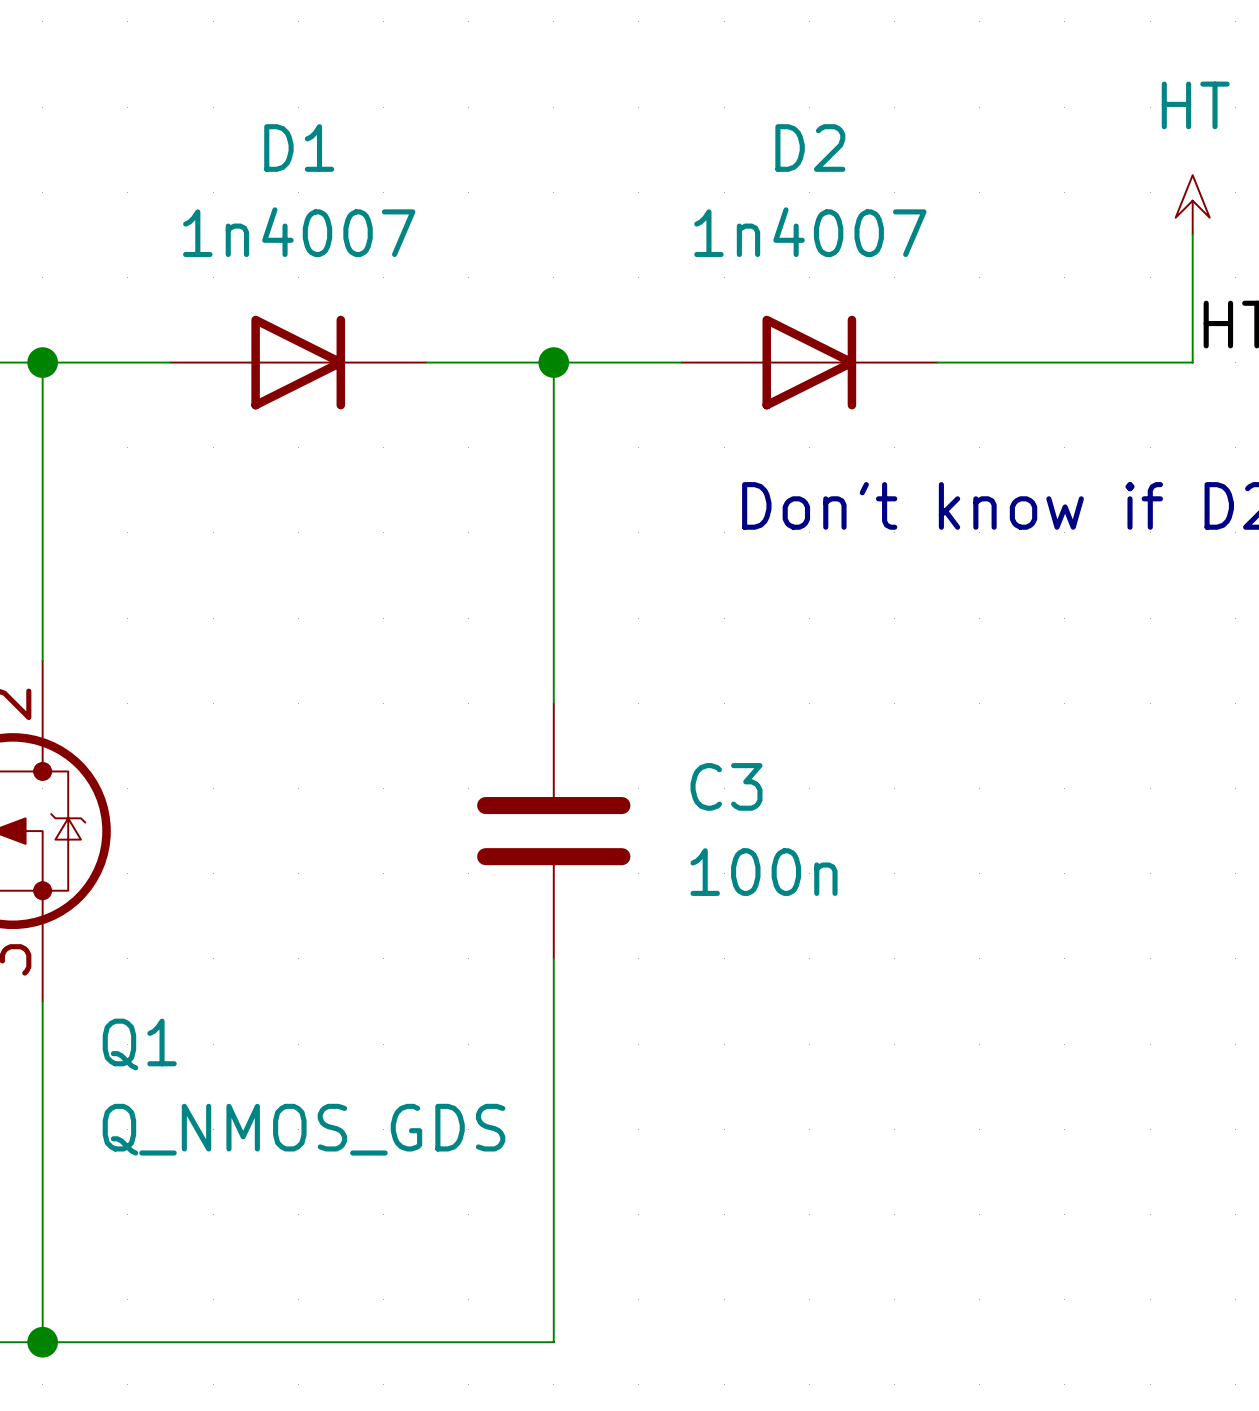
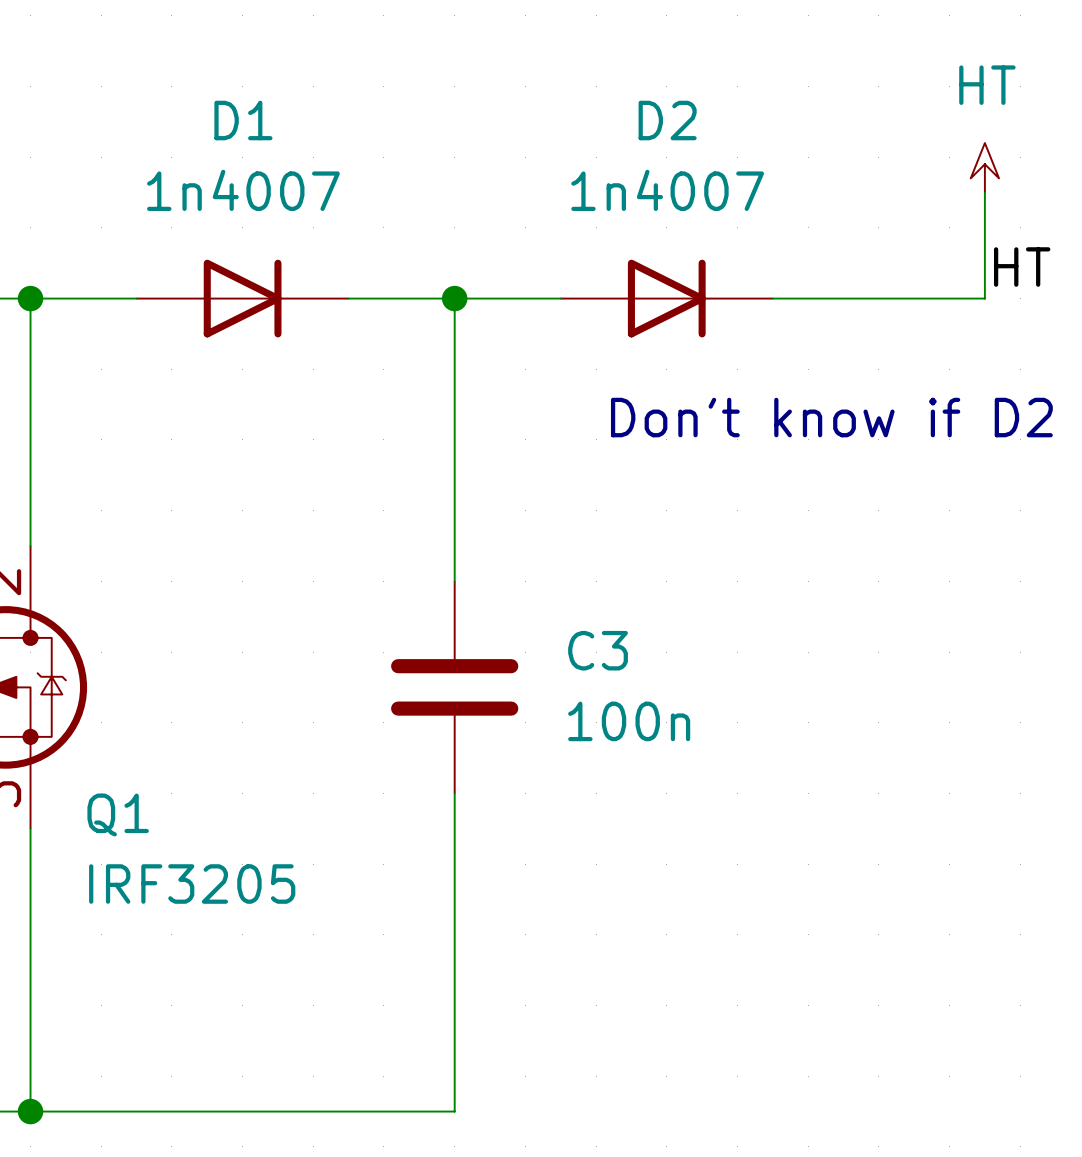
Q1 name position: Q1 (139, 1044) -> Q1 (118, 815)
Q1 value: Q_NMOS_GDS (304, 1129) -> IRF3205 (192, 884)

